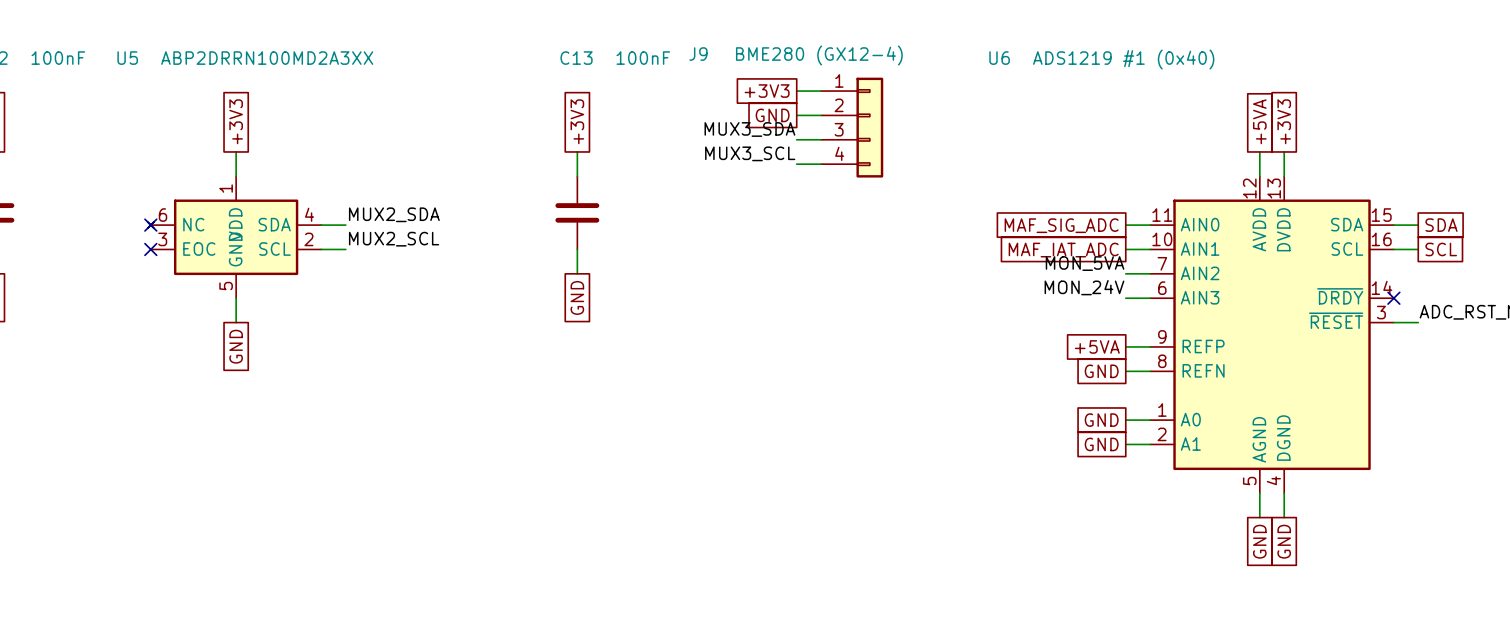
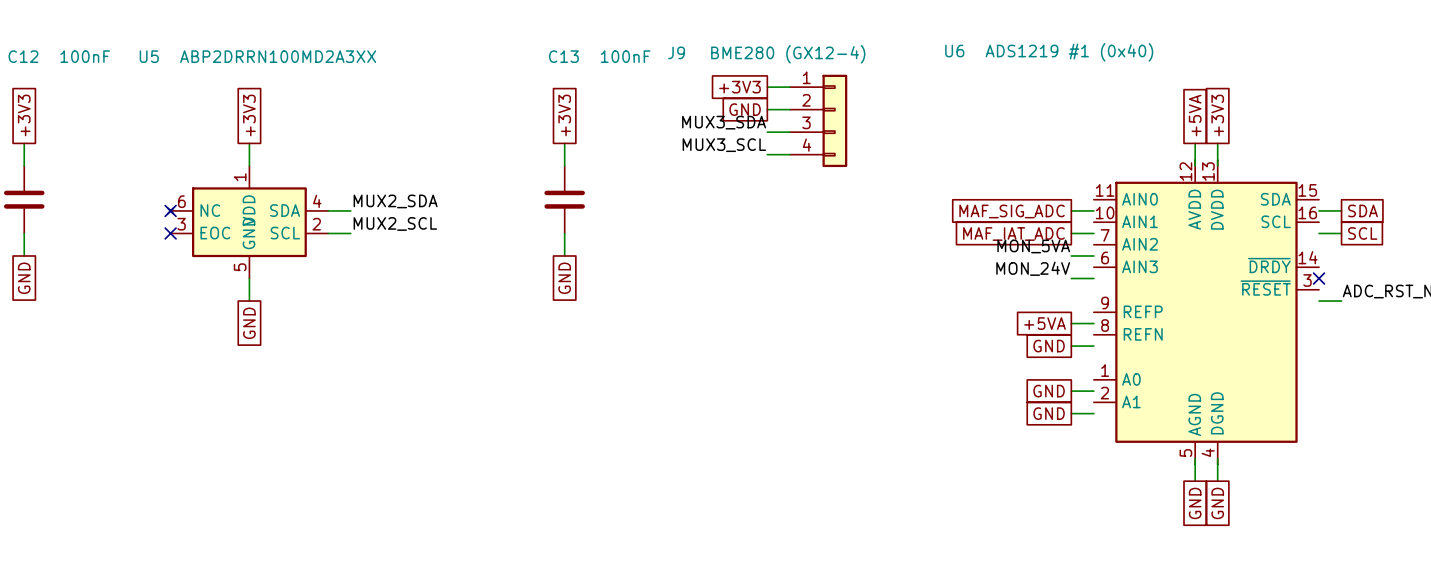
U6 symbol: [1150, 176, 1394, 494] -> [1093, 160, 1320, 465]

